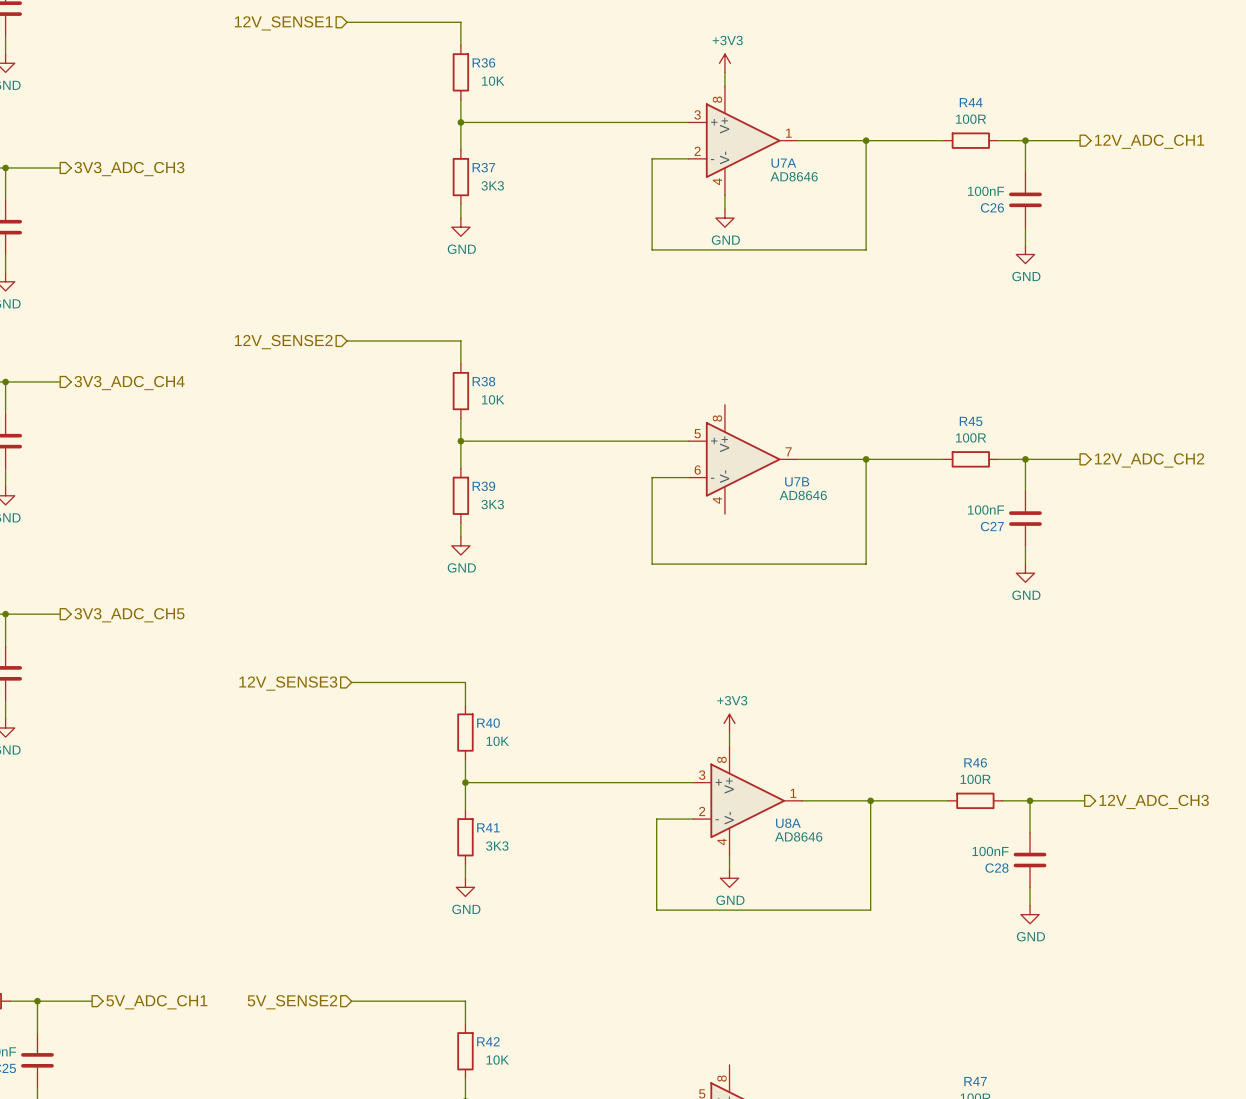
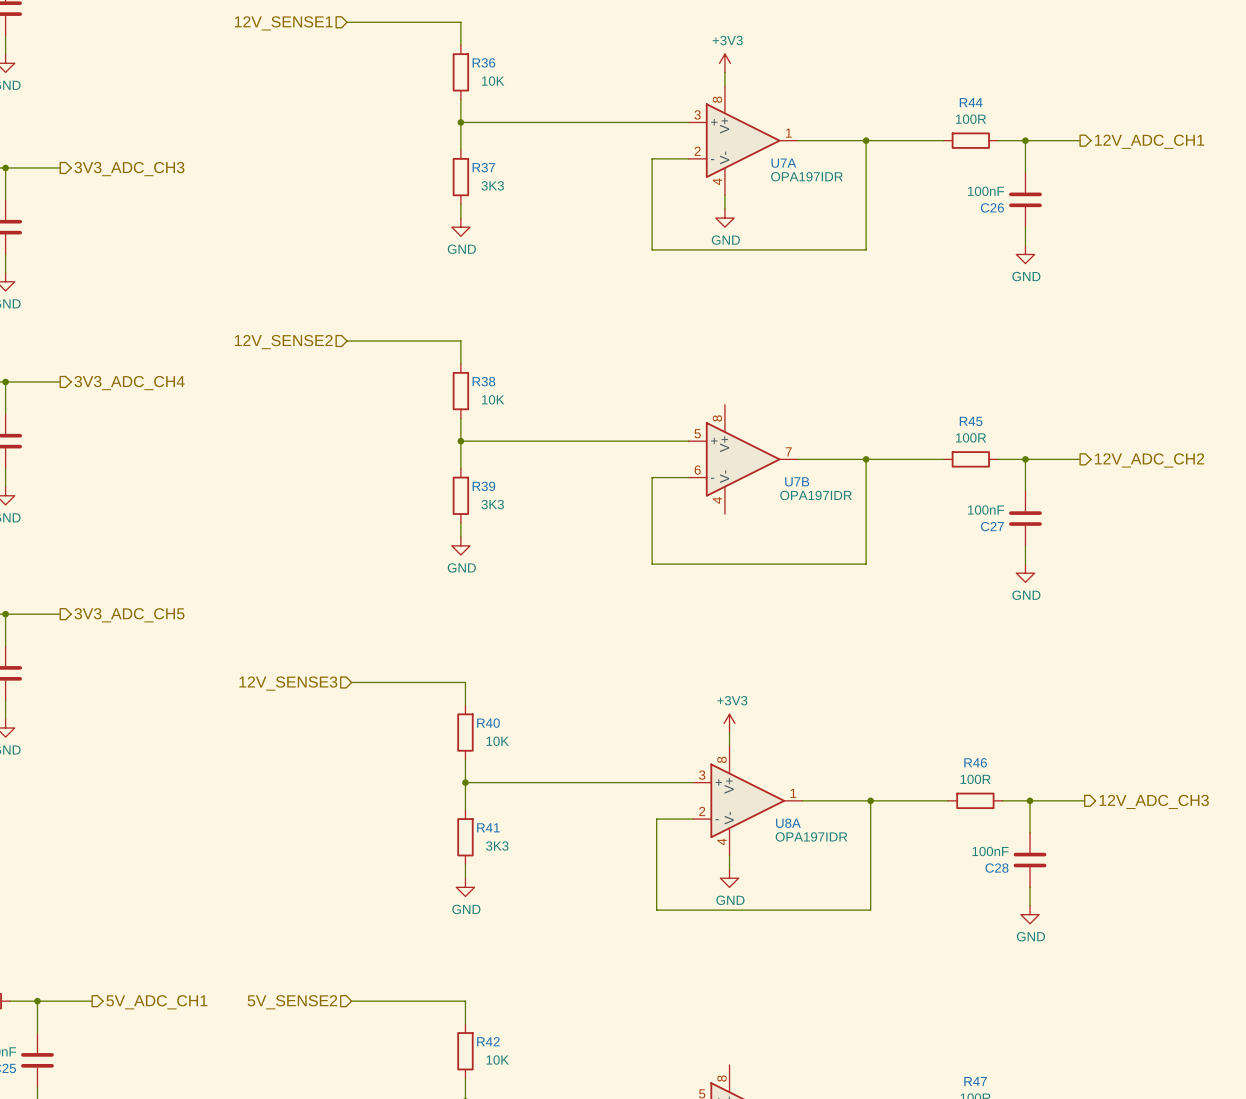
U7A value: AD8646 (794, 176) -> OPA197IDR (806, 176)
U7B value: AD8646 (803, 495) -> OPA197IDR (816, 495)
U8A value: AD8646 (798, 836) -> OPA197IDR (811, 836)

